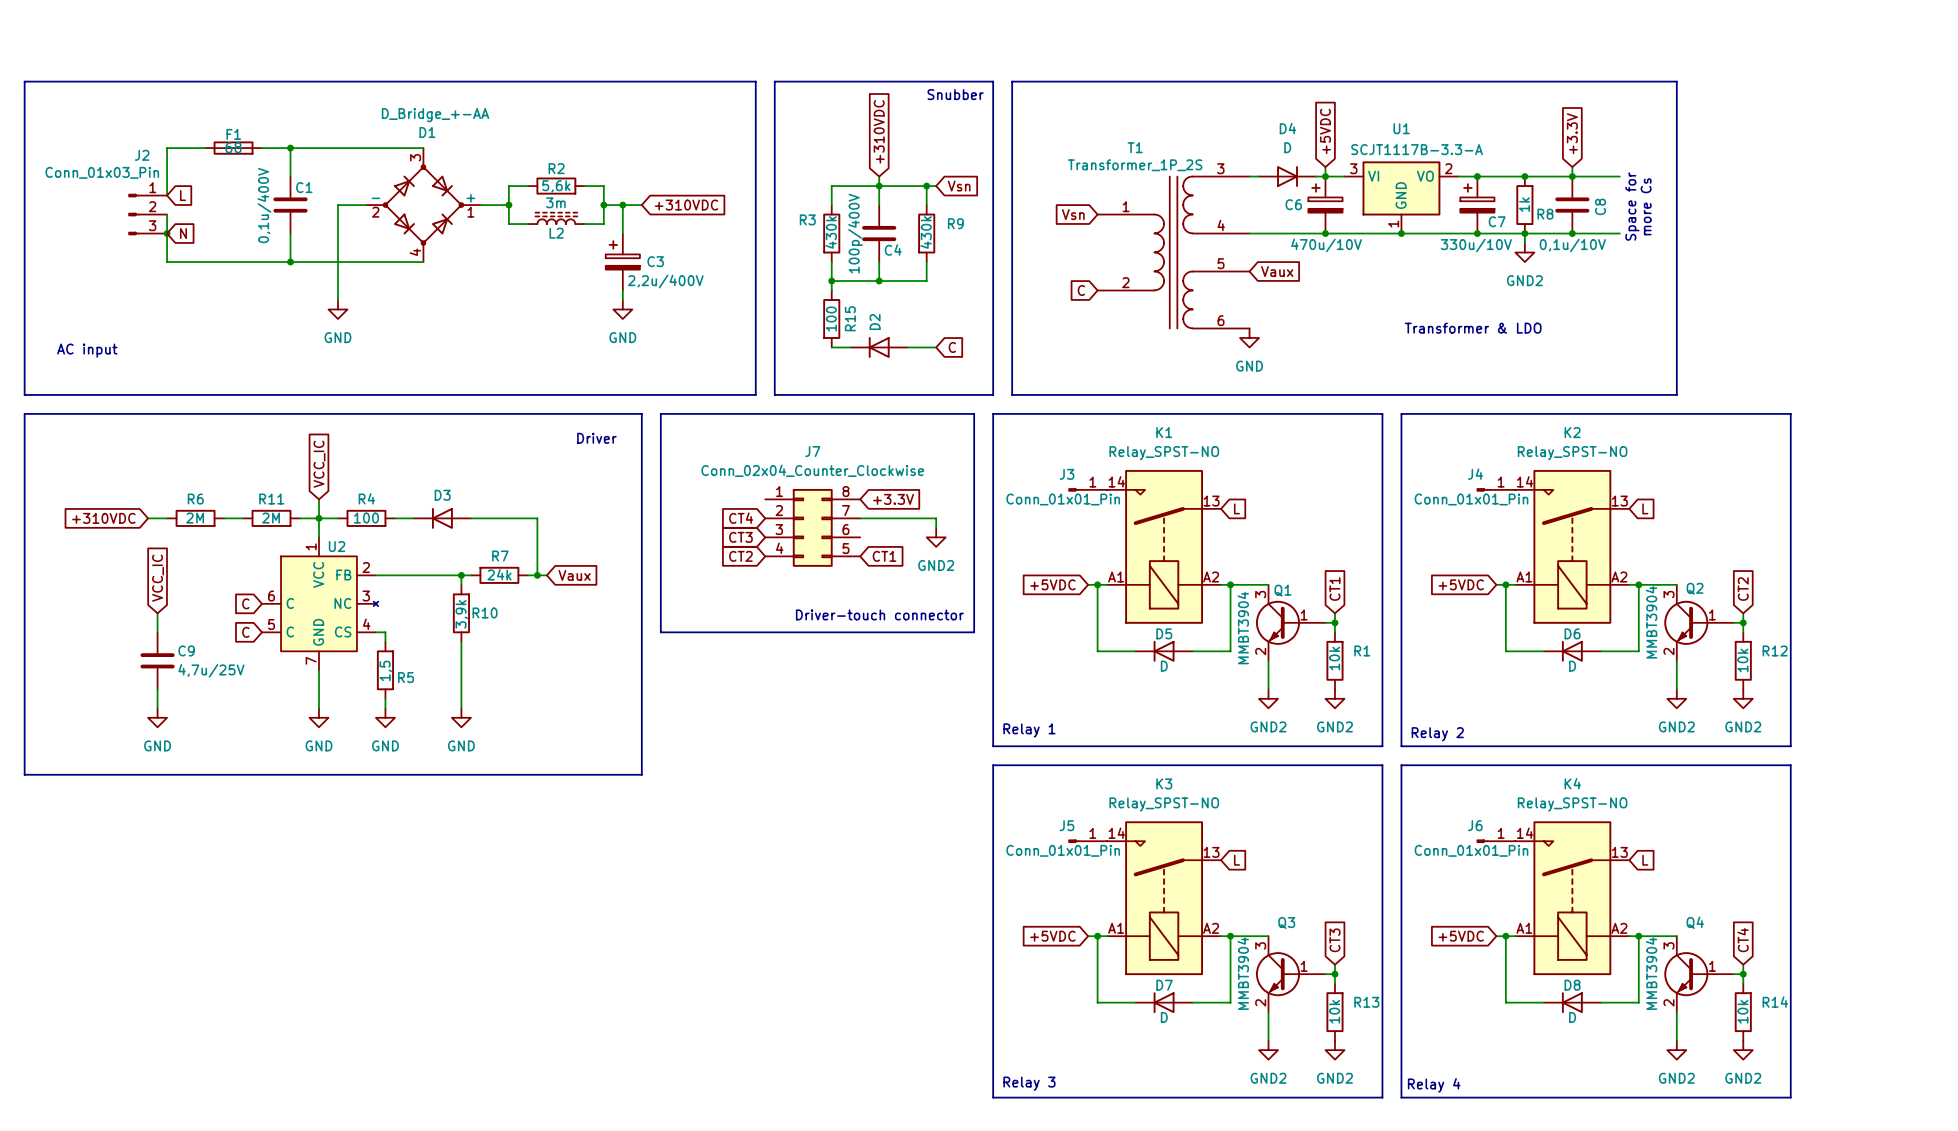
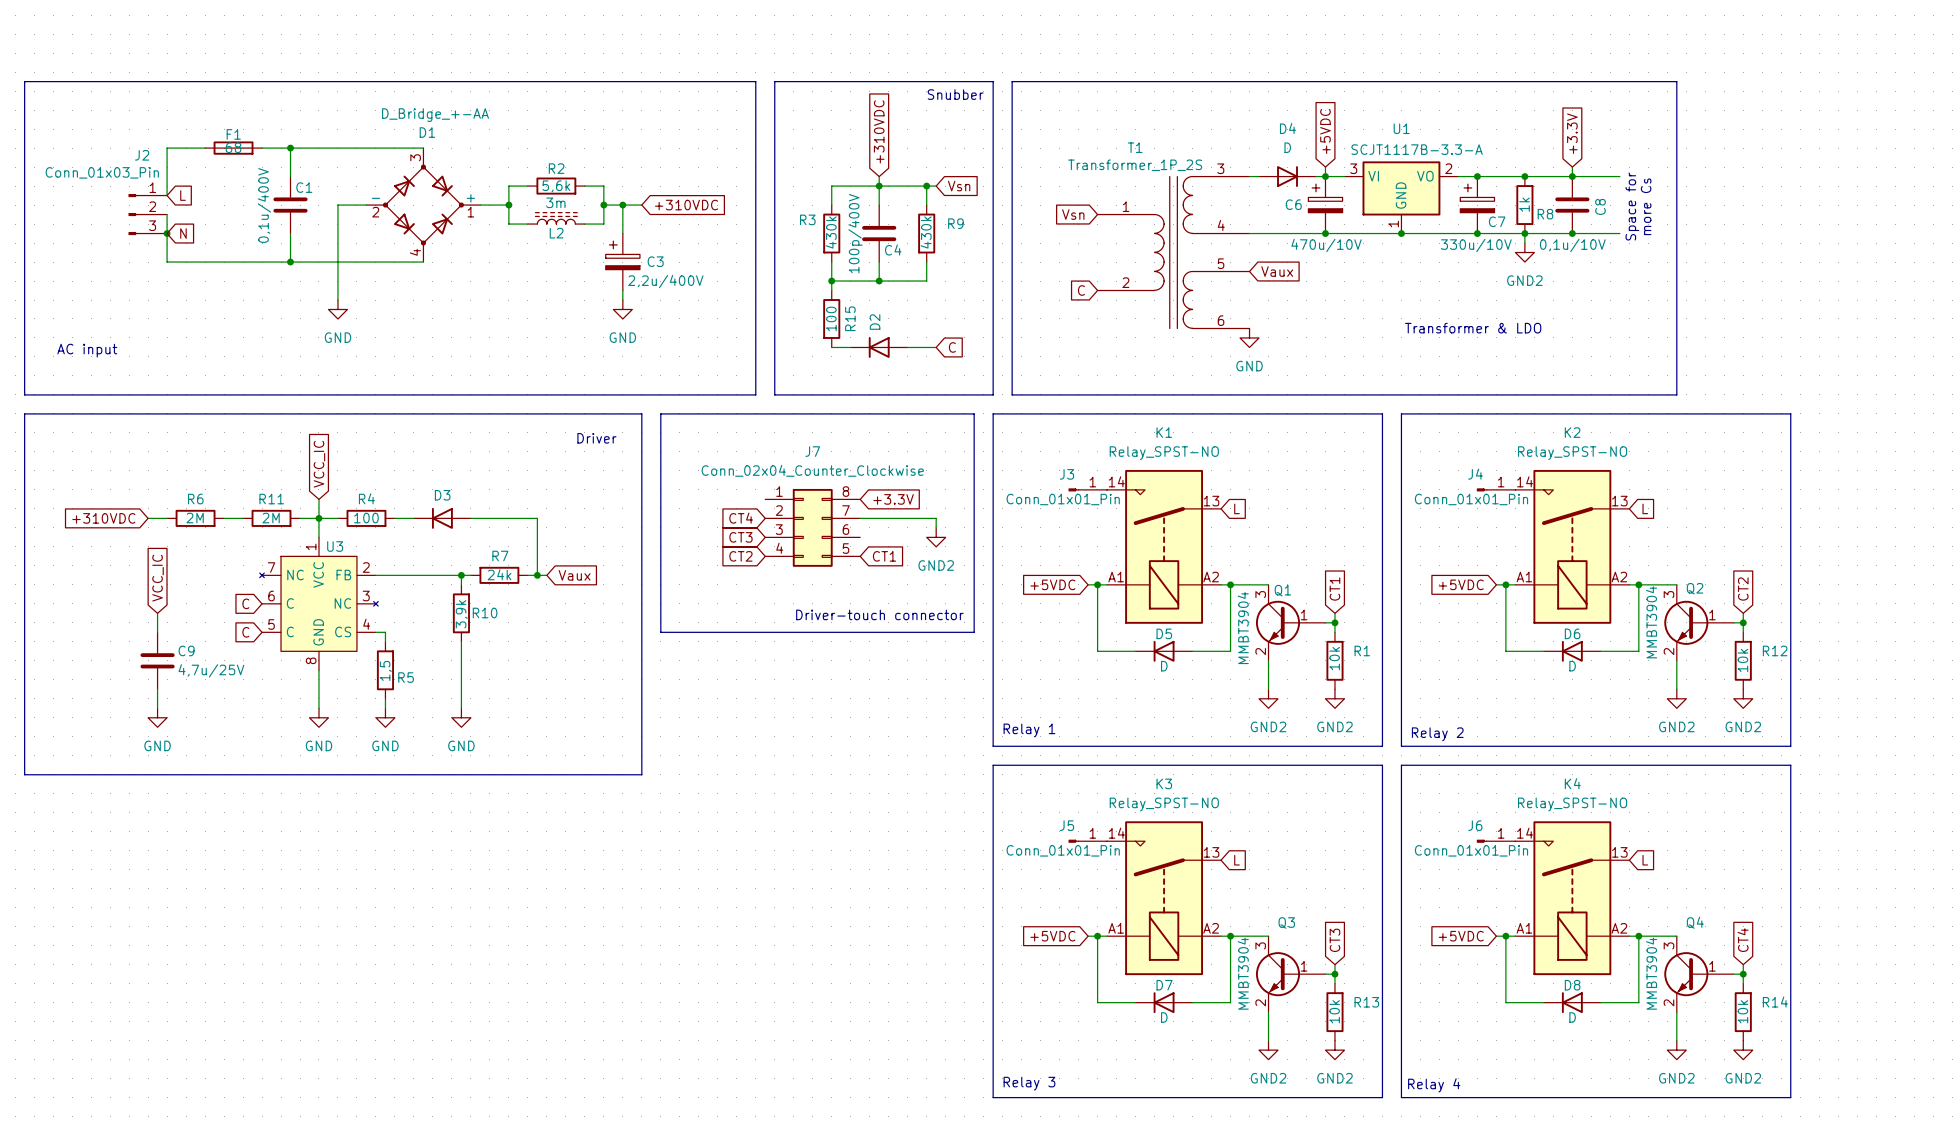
U3: none -> (318, 603)
U2: (320, 603) -> none

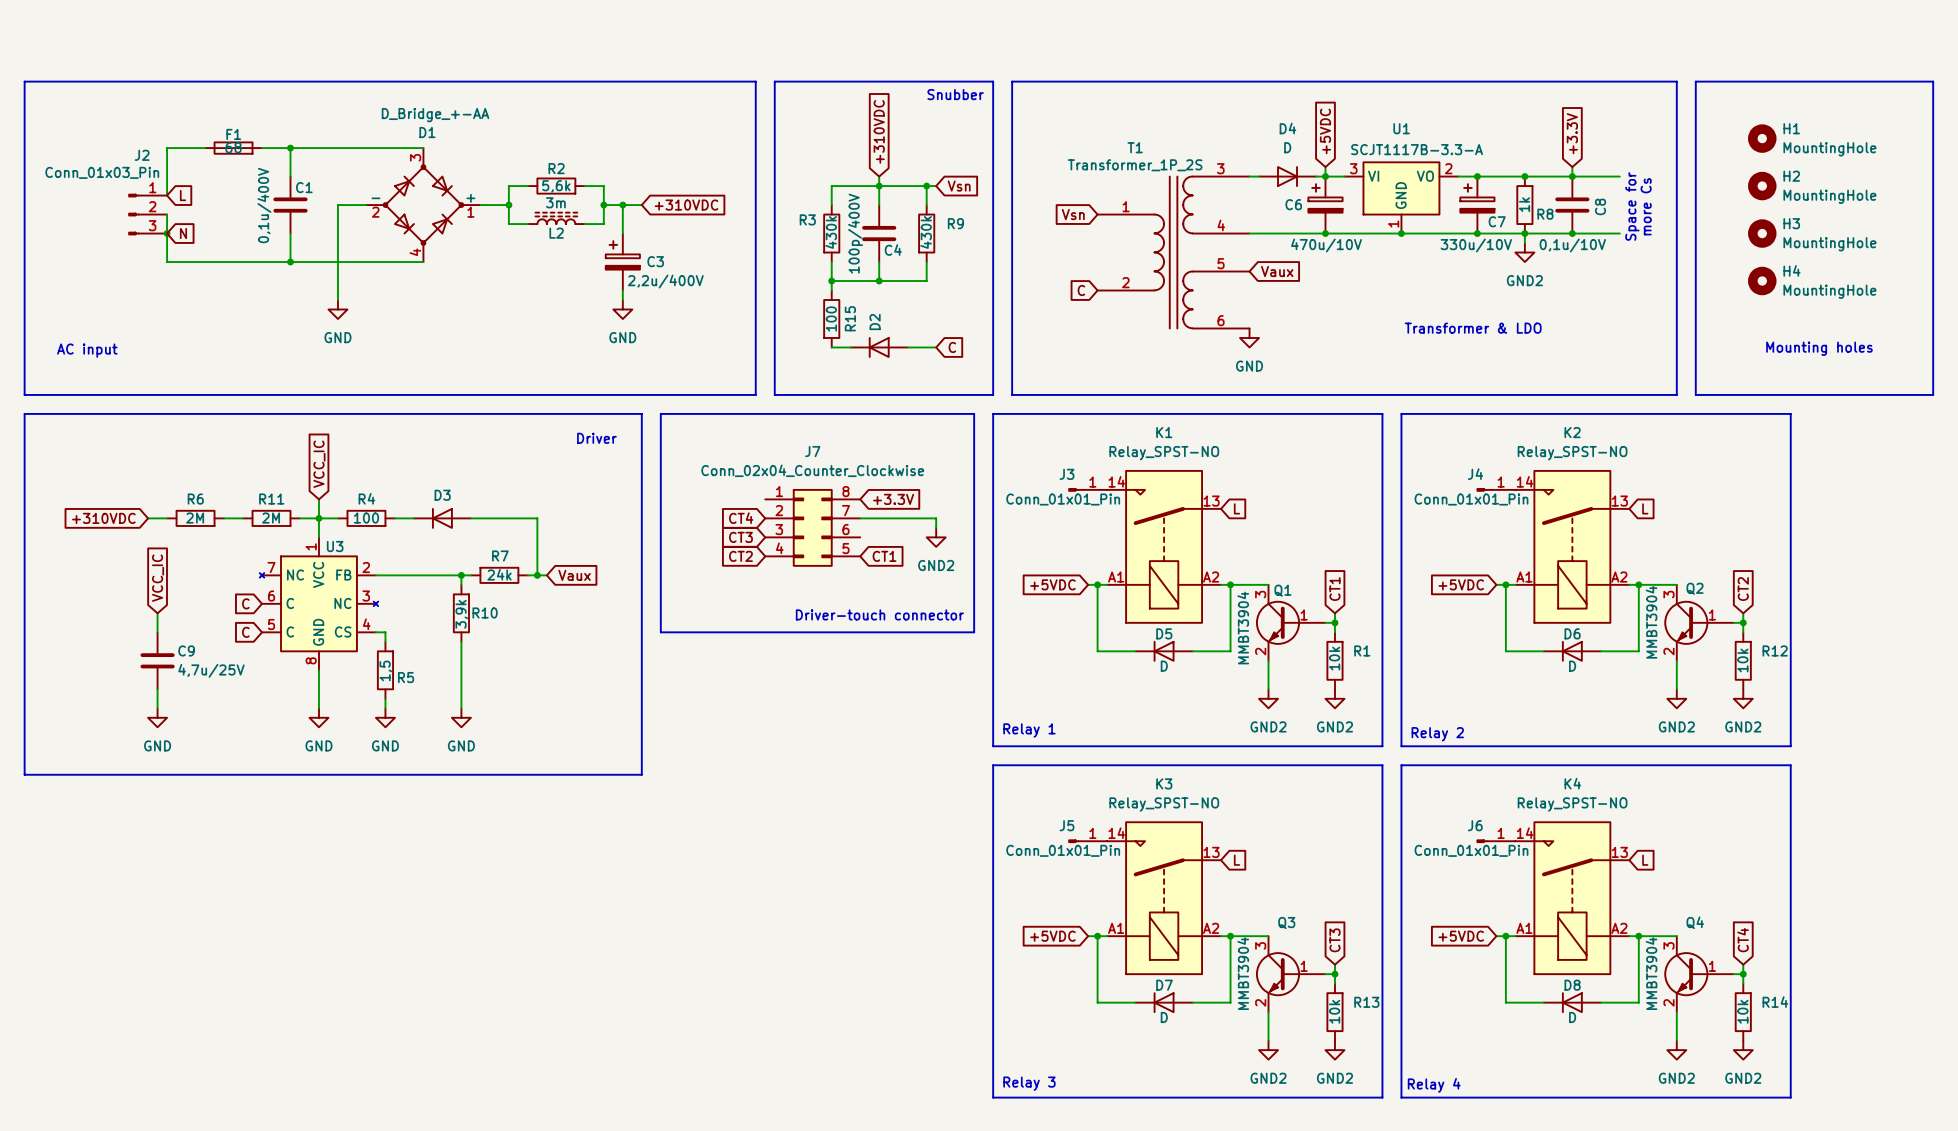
line: none -> (1695, 81) (1933, 81) (1933, 394) (1695, 394) (1695, 81)
H1: none -> MountingHole (1762, 138)
H2: none -> MountingHole (1762, 186)
H3: none -> MountingHole (1762, 233)
H4: none -> MountingHole (1762, 281)
text: none -> Mounting holes (1819, 348)

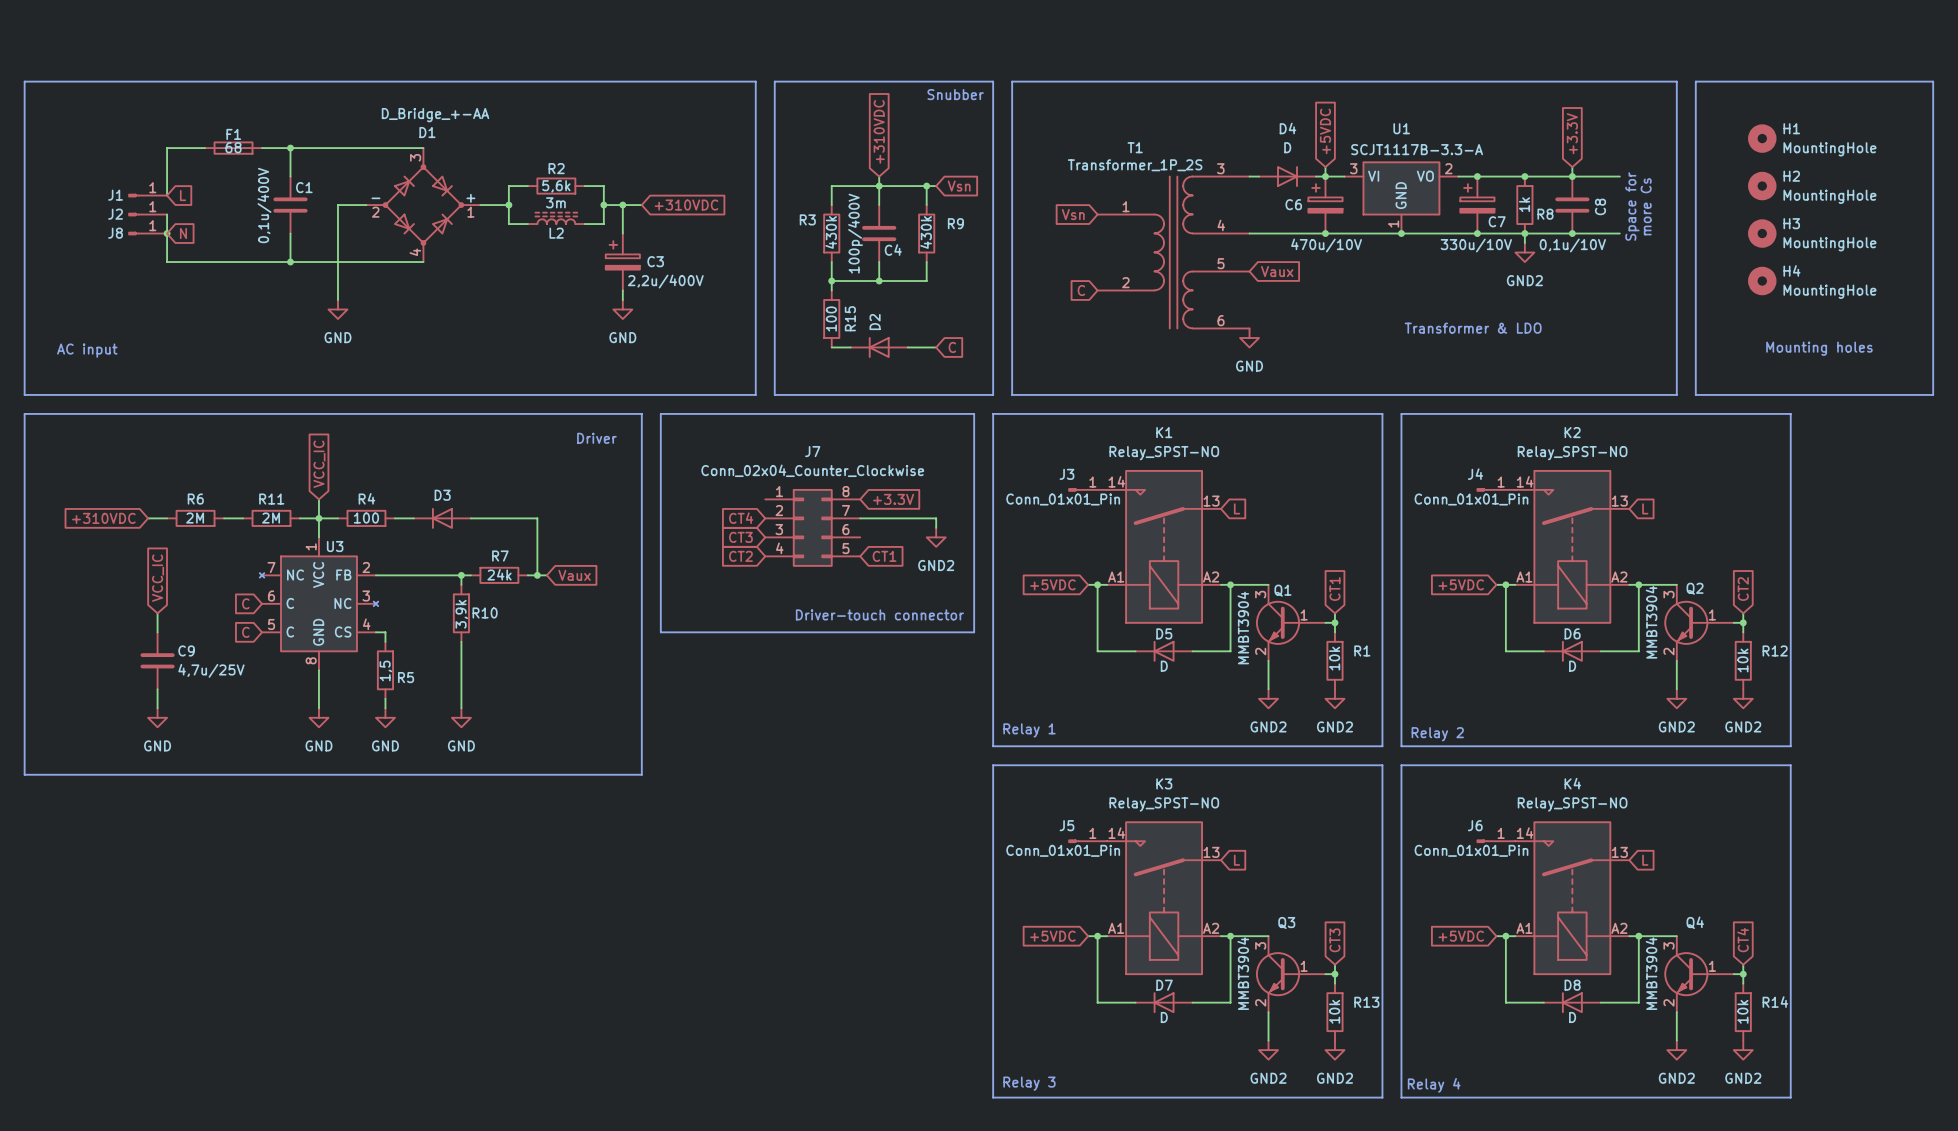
J2 name position: J2 (142, 155) -> J2 (115, 214)
J2 value: Conn_01x03_Pin (102, 172) -> none
J2 symbol: [128, 194, 168, 236] -> [128, 213, 168, 217]
J1: none -> (147, 195)
J8: none -> (147, 233)

